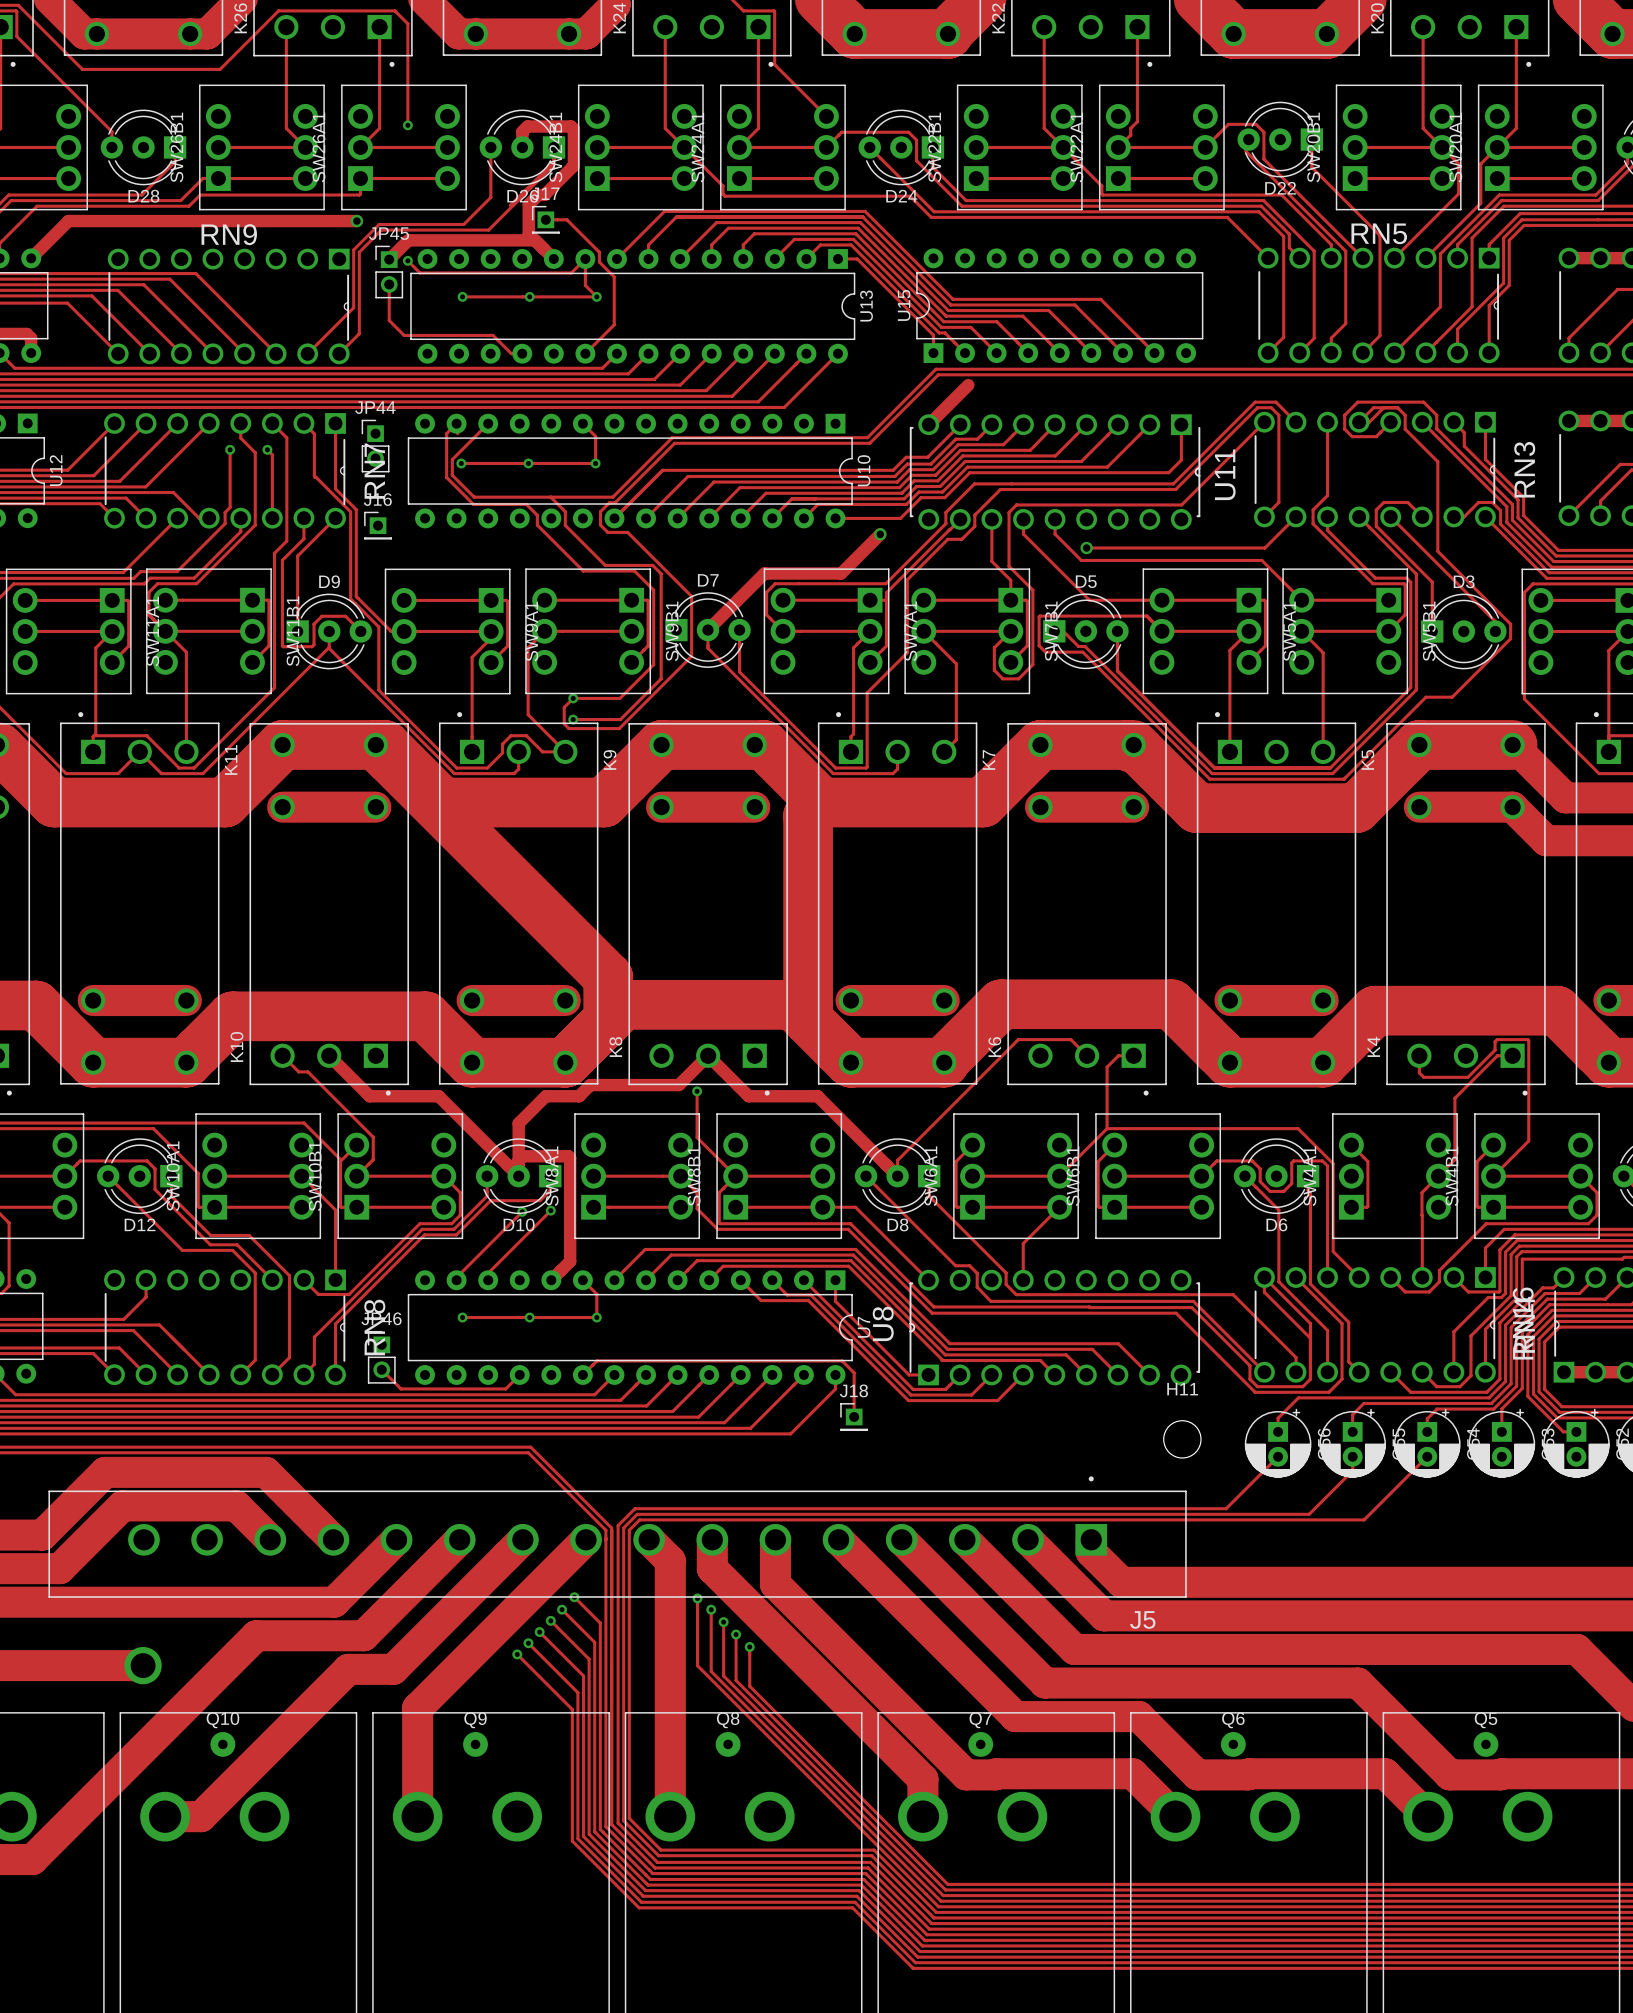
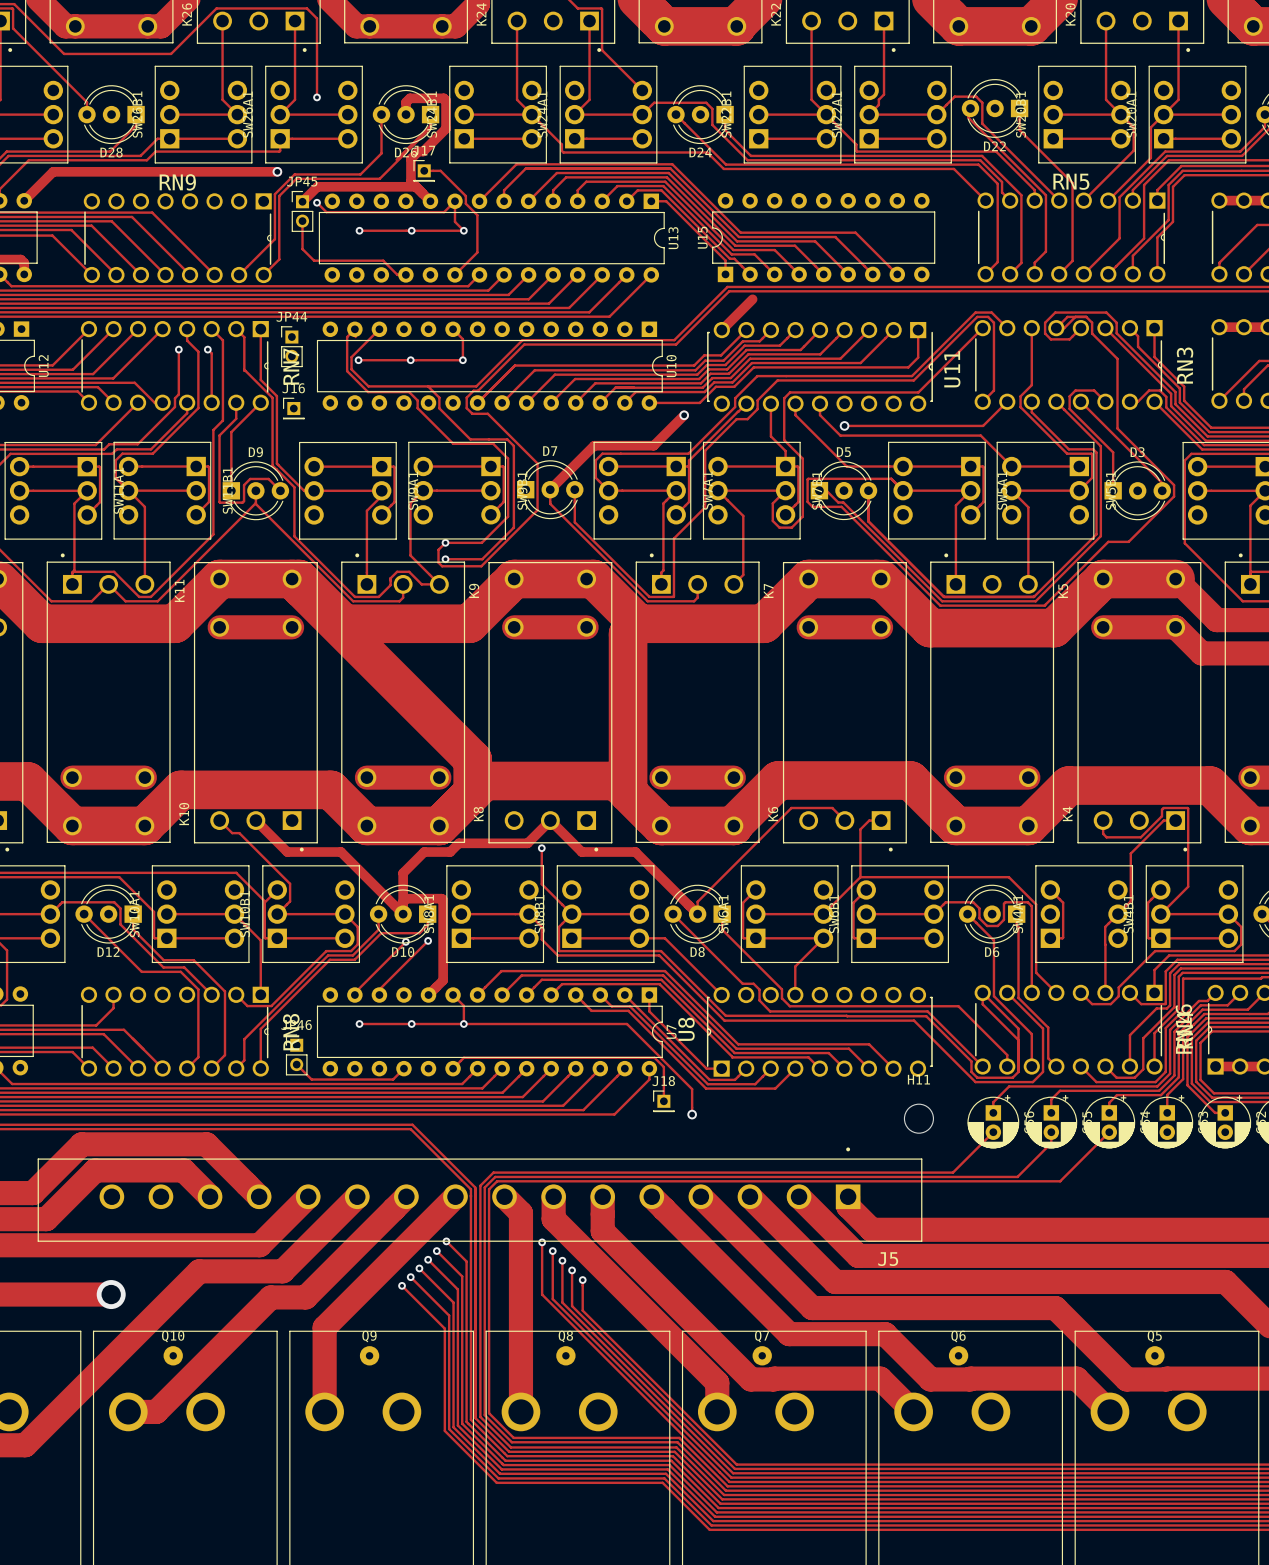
track: none -> (463, 1024) (626, 1024) (692, 1089) (692, 1114)
via: none -> (692, 1114)

